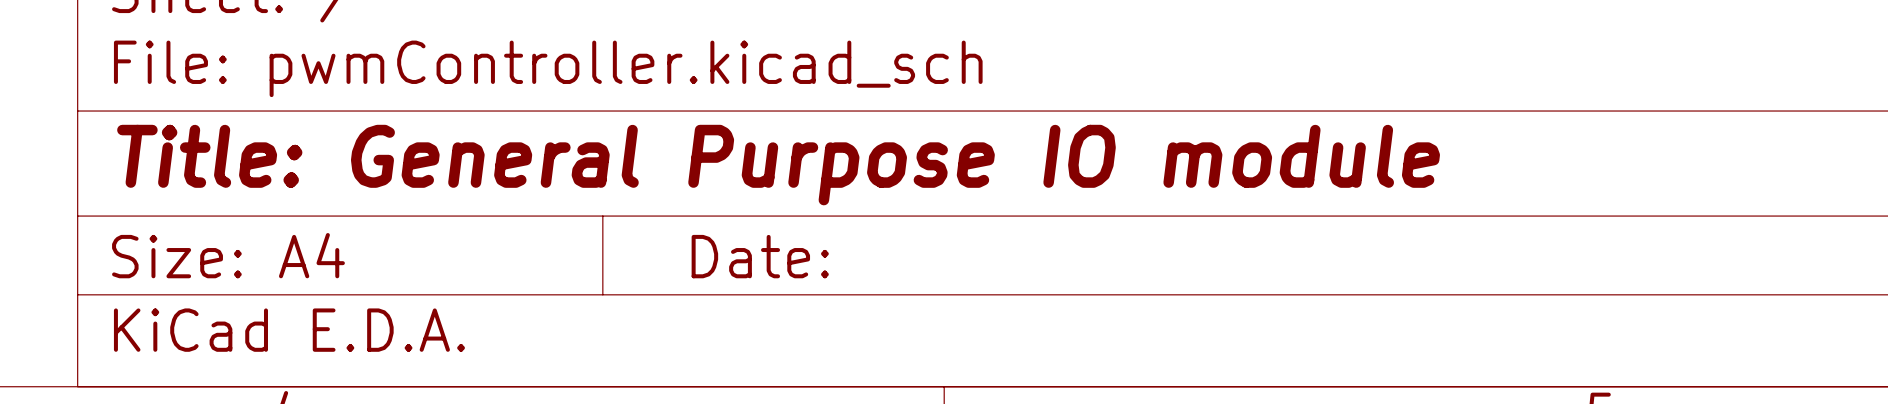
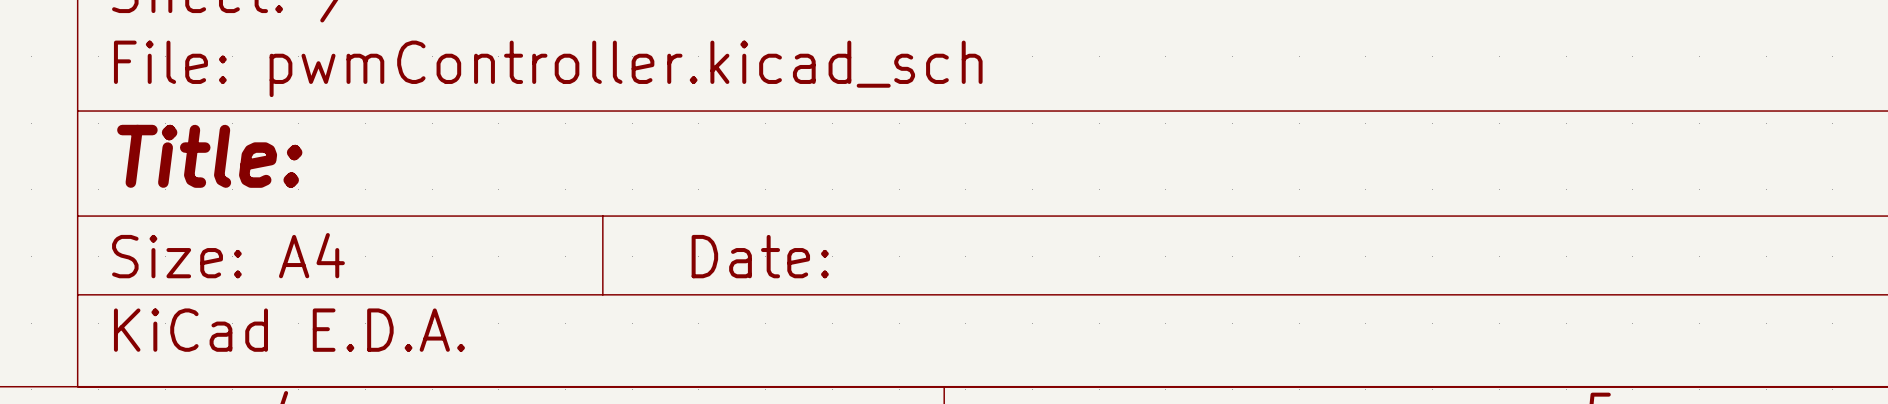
title block: Title: General Purpose IO module (778, 165) -> Title: (209, 156)

